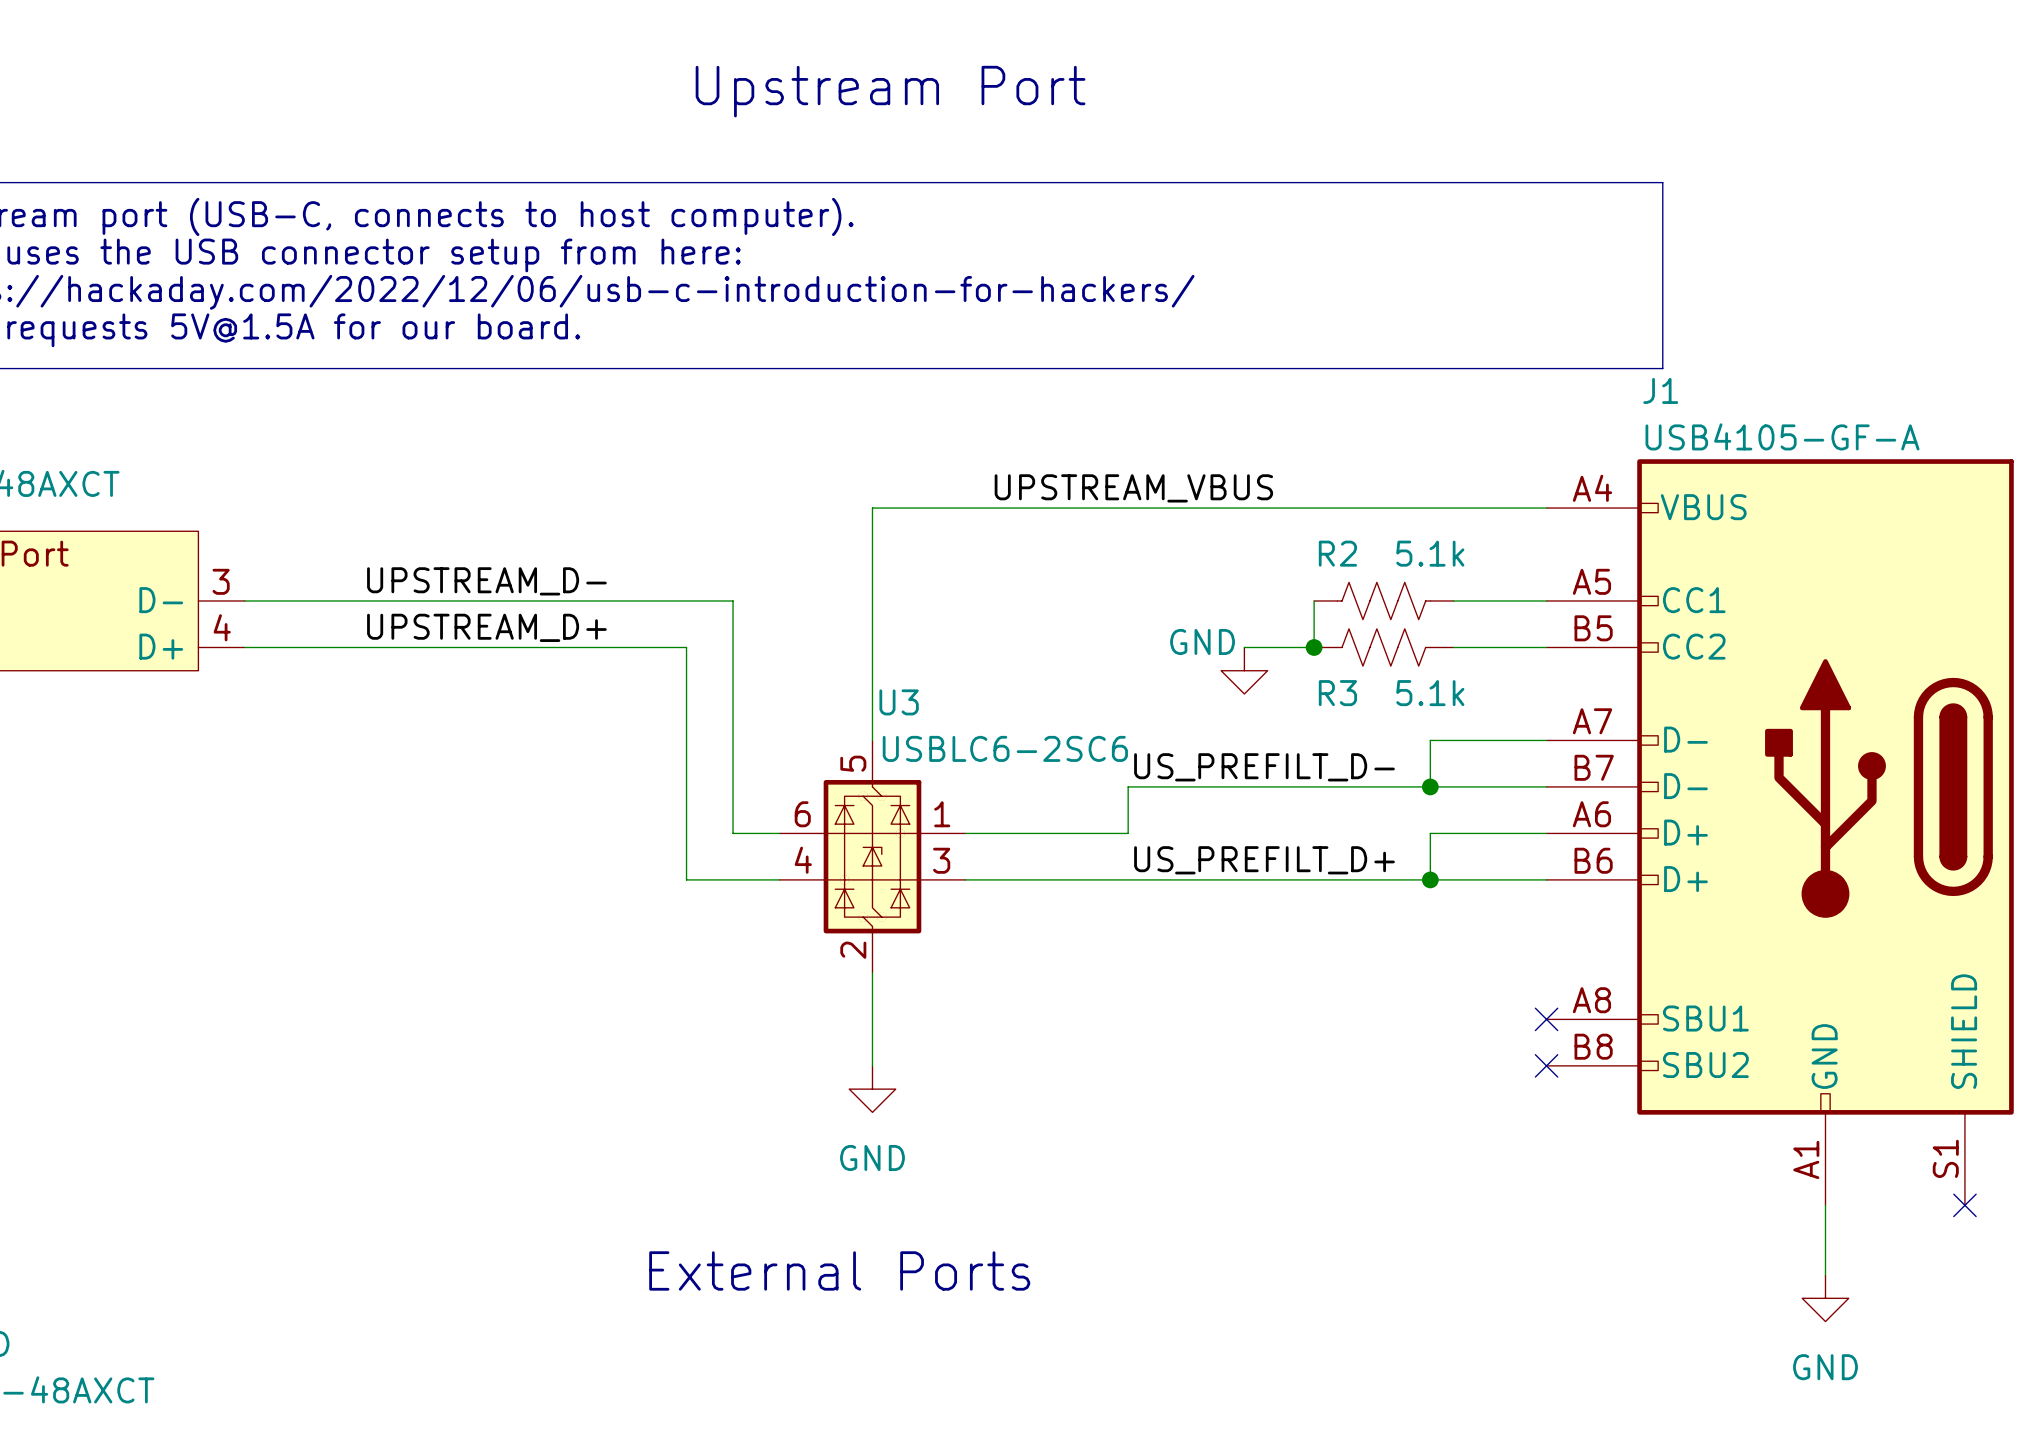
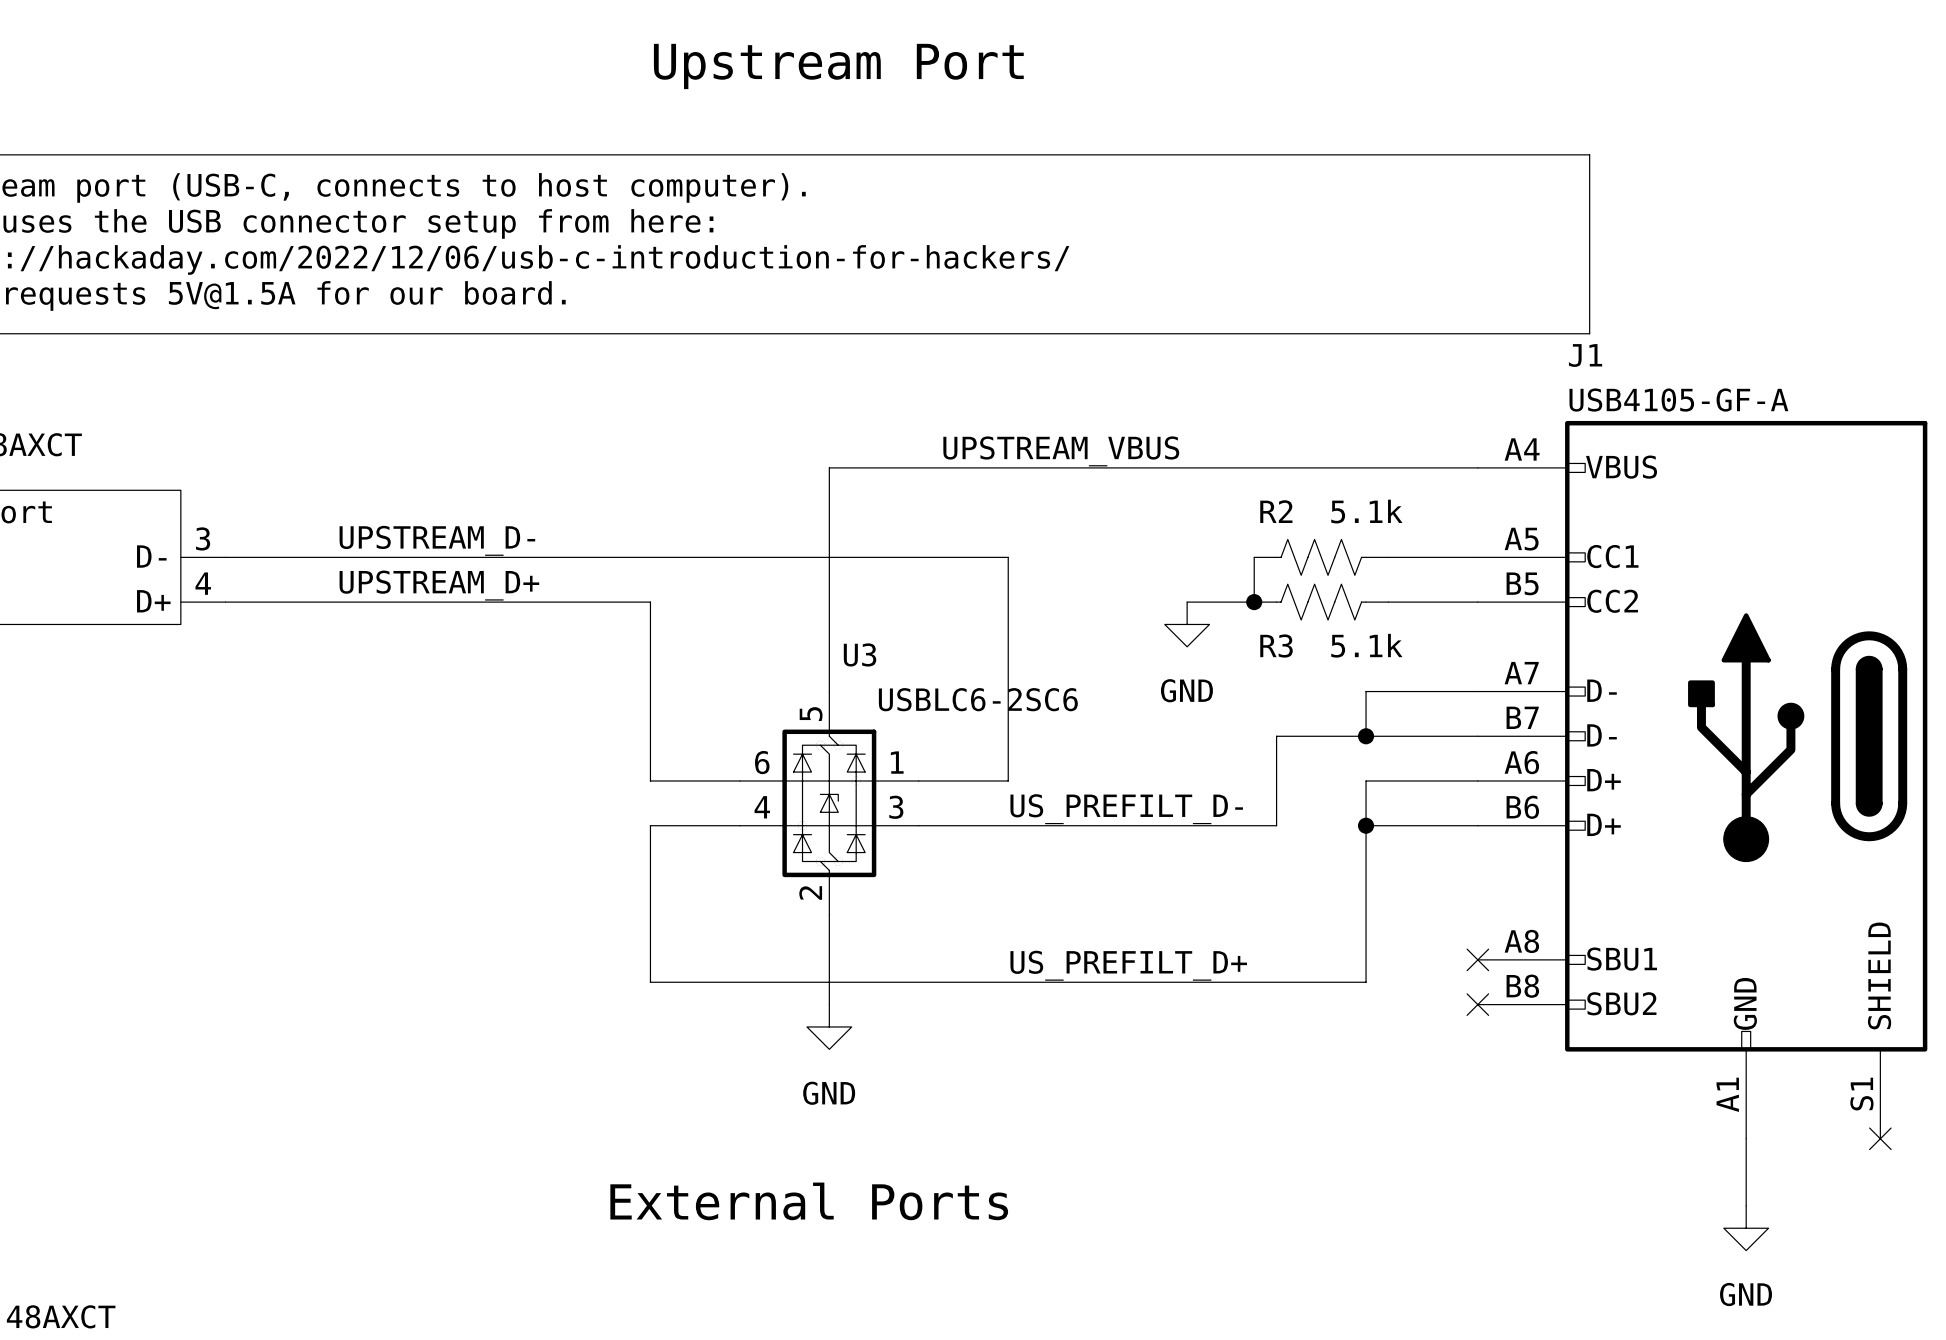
wire: (733, 601) (733, 833) -> (695, 557) (1008, 557) (1008, 780)
power symbol text position: GND (1202, 641) -> GND (1186, 690)
label position: US_PREFILT_D- (1264, 767) -> US_PREFILT_D- (1126, 809)
wire: (1337, 786) (1128, 786) (1128, 833) (1058, 833) -> none
wire: (686, 833) (686, 879) -> (650, 780) (695, 780)
label position: US_PREFILT_D+ (1264, 860) -> US_PREFILT_D+ (1128, 965)
wire: none -> (650, 825) (650, 982) (1366, 982) (1366, 825)
wire: (1337, 879) (1430, 879) -> (1276, 825) (1276, 736)

